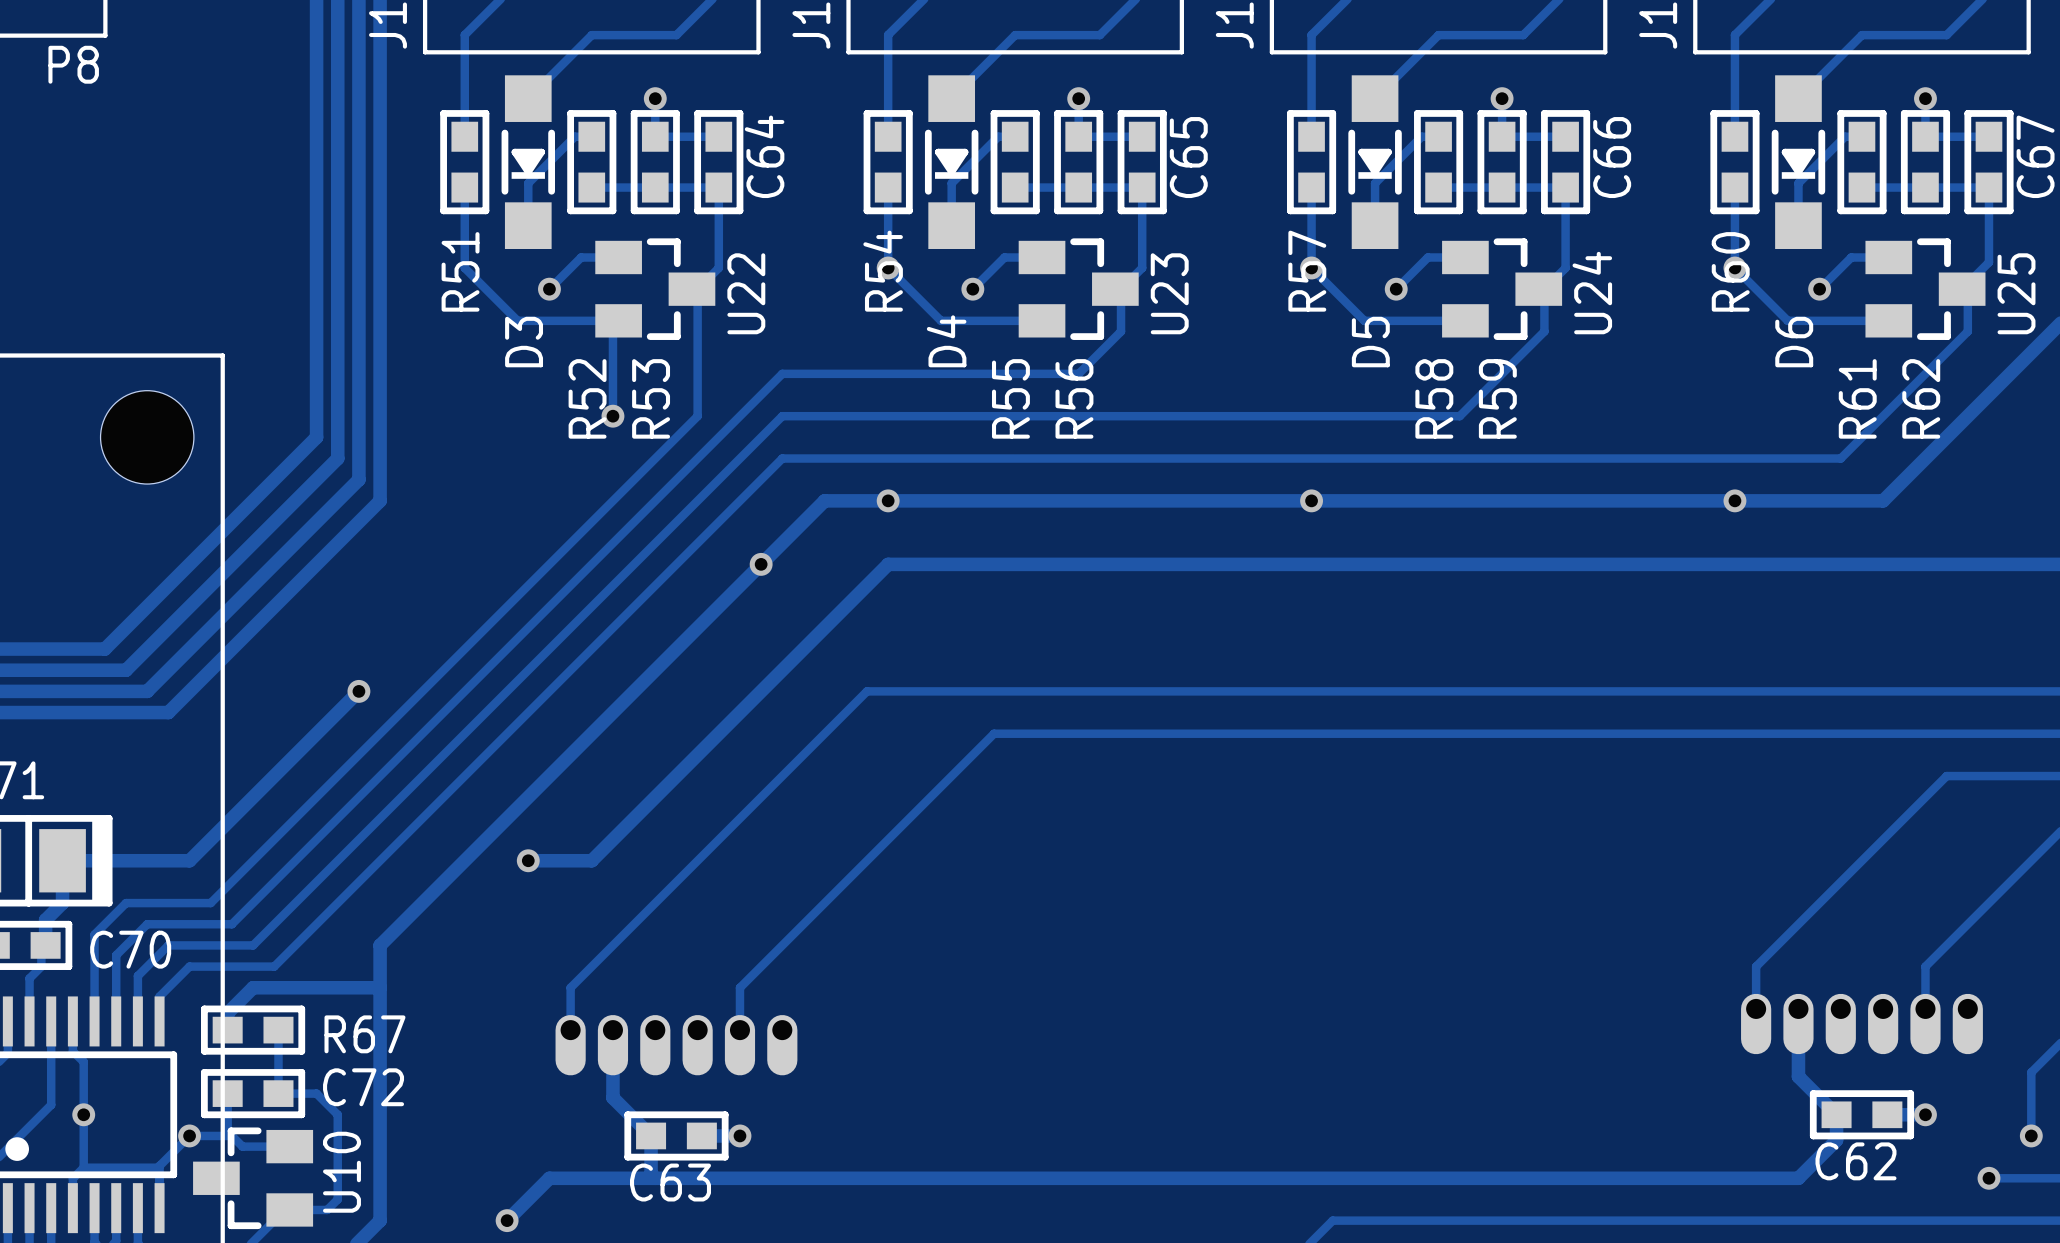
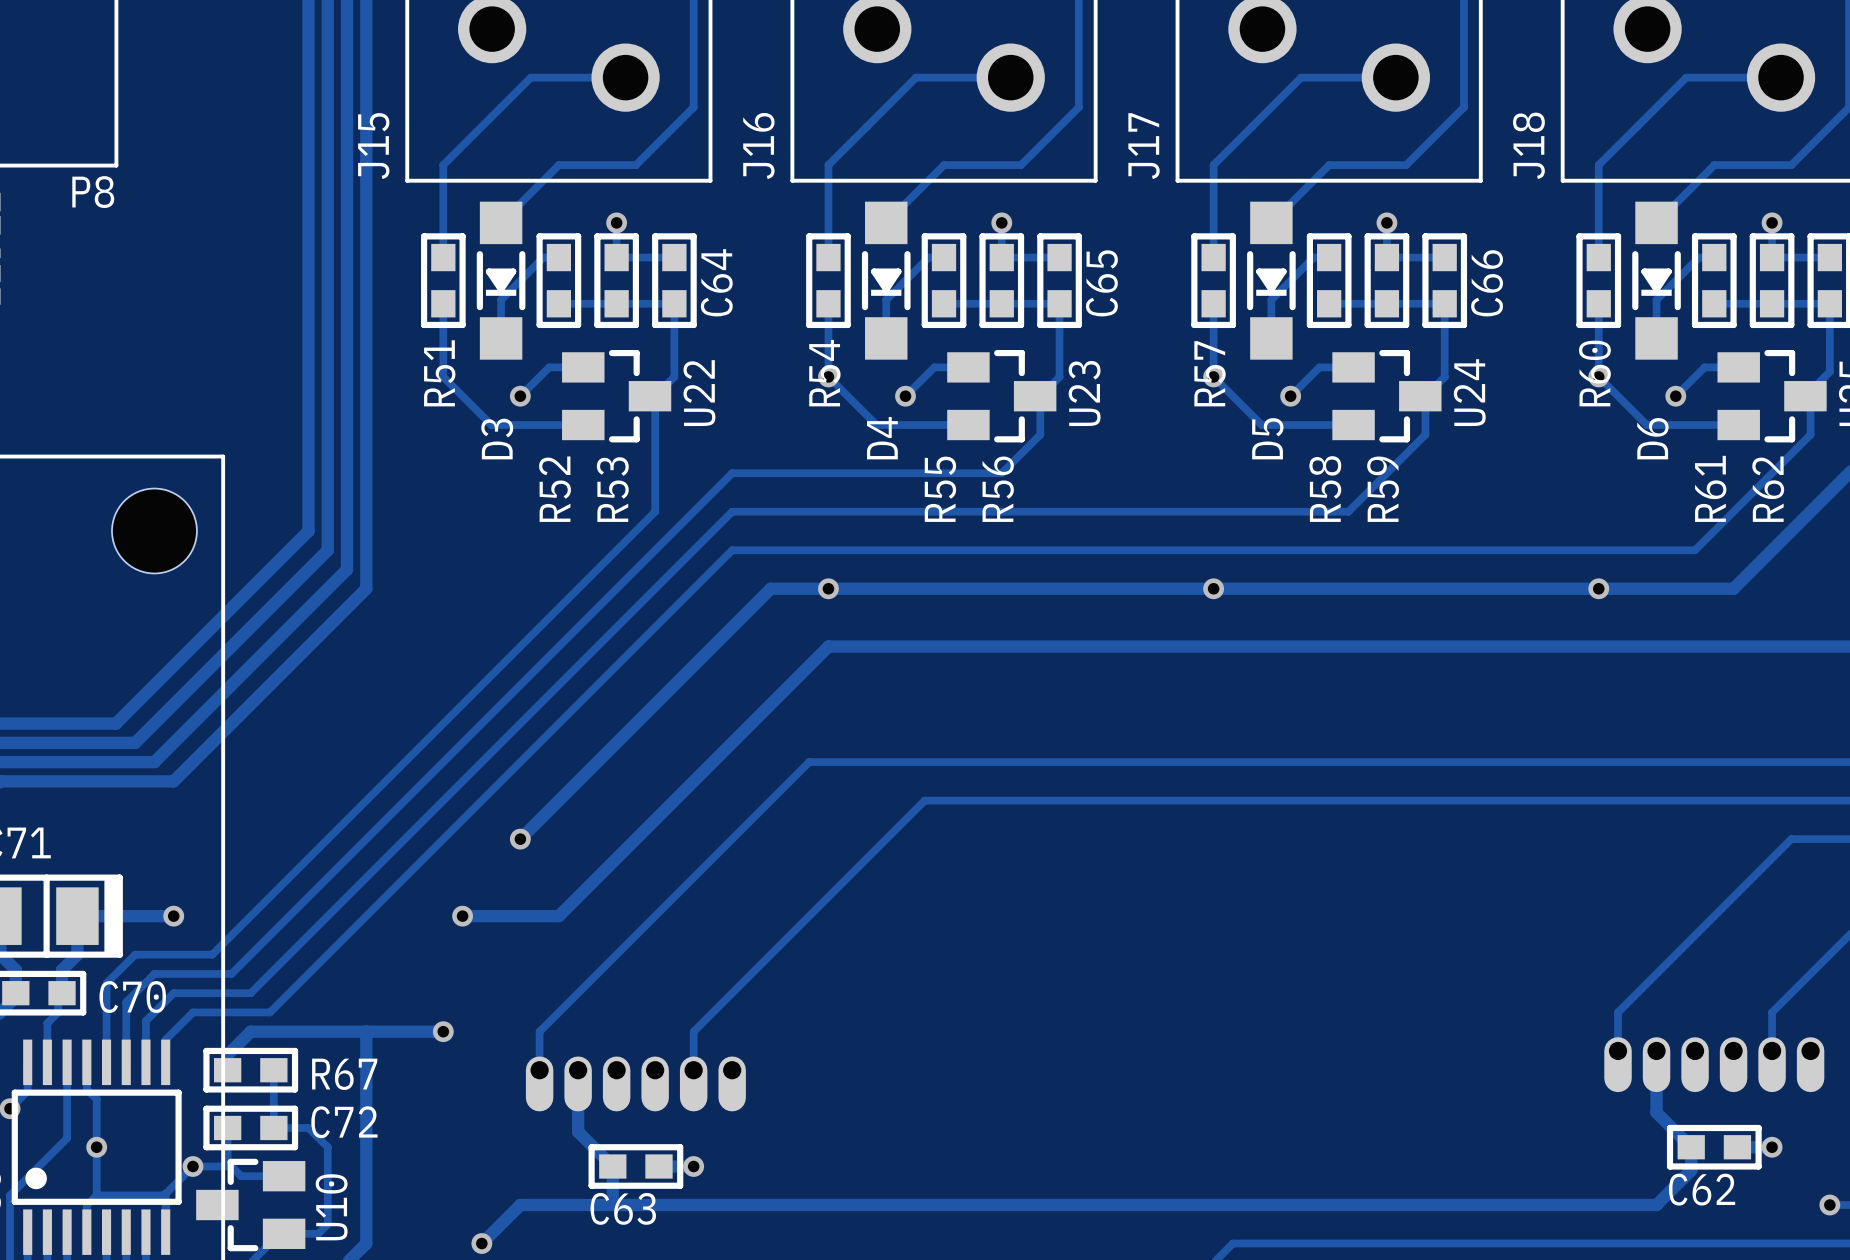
track: (618, 320) (612, 326) (612, 416) -> none
via: (612, 416) -> none
via: (761, 564) -> none
track: (358, 691) (189, 860) (168, 860) -> none
via: (358, 691) -> none
track: (549, 776) (380, 945) (380, 987) -> (443, 1031) (366, 1031)
via: none -> (520, 839)
via: none -> (173, 916)
track: none -> (462, 916) (501, 916)
via position: (528, 860) -> (462, 916)
via: none -> (443, 1031)

